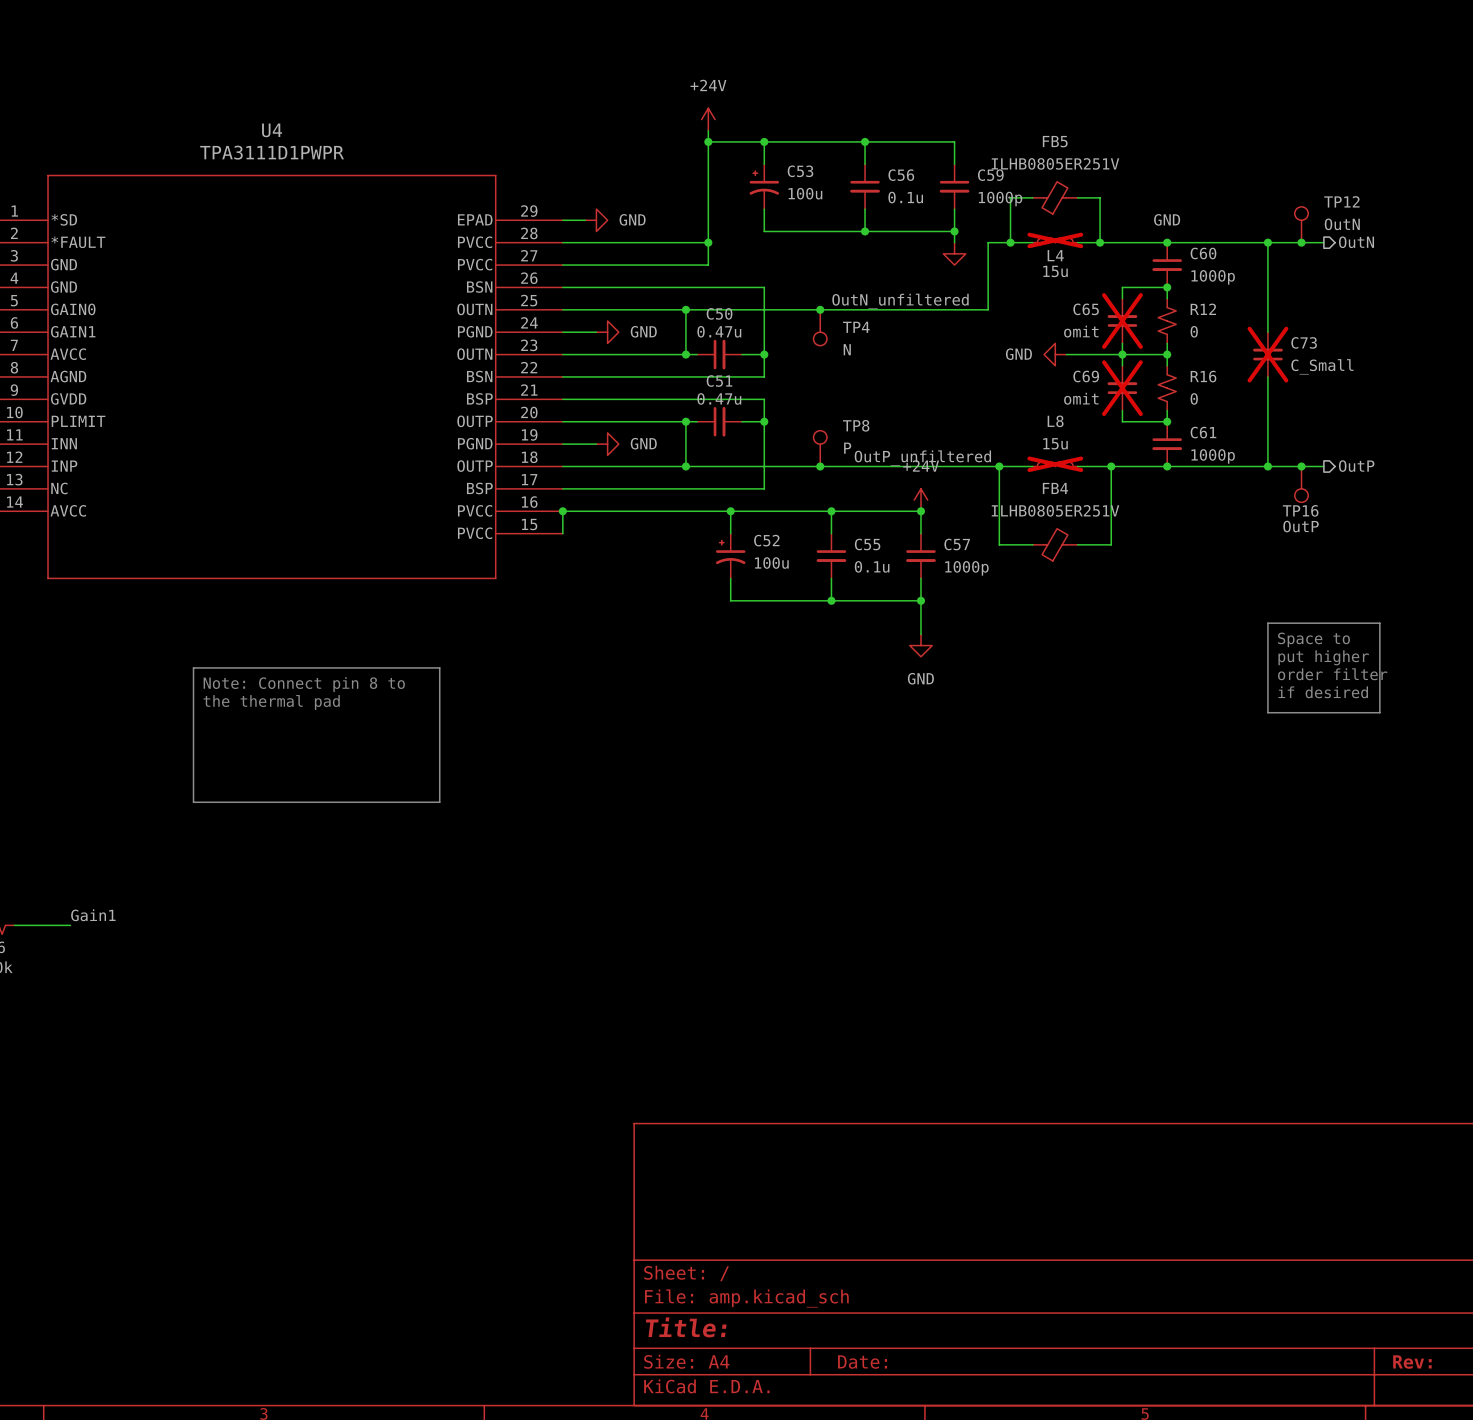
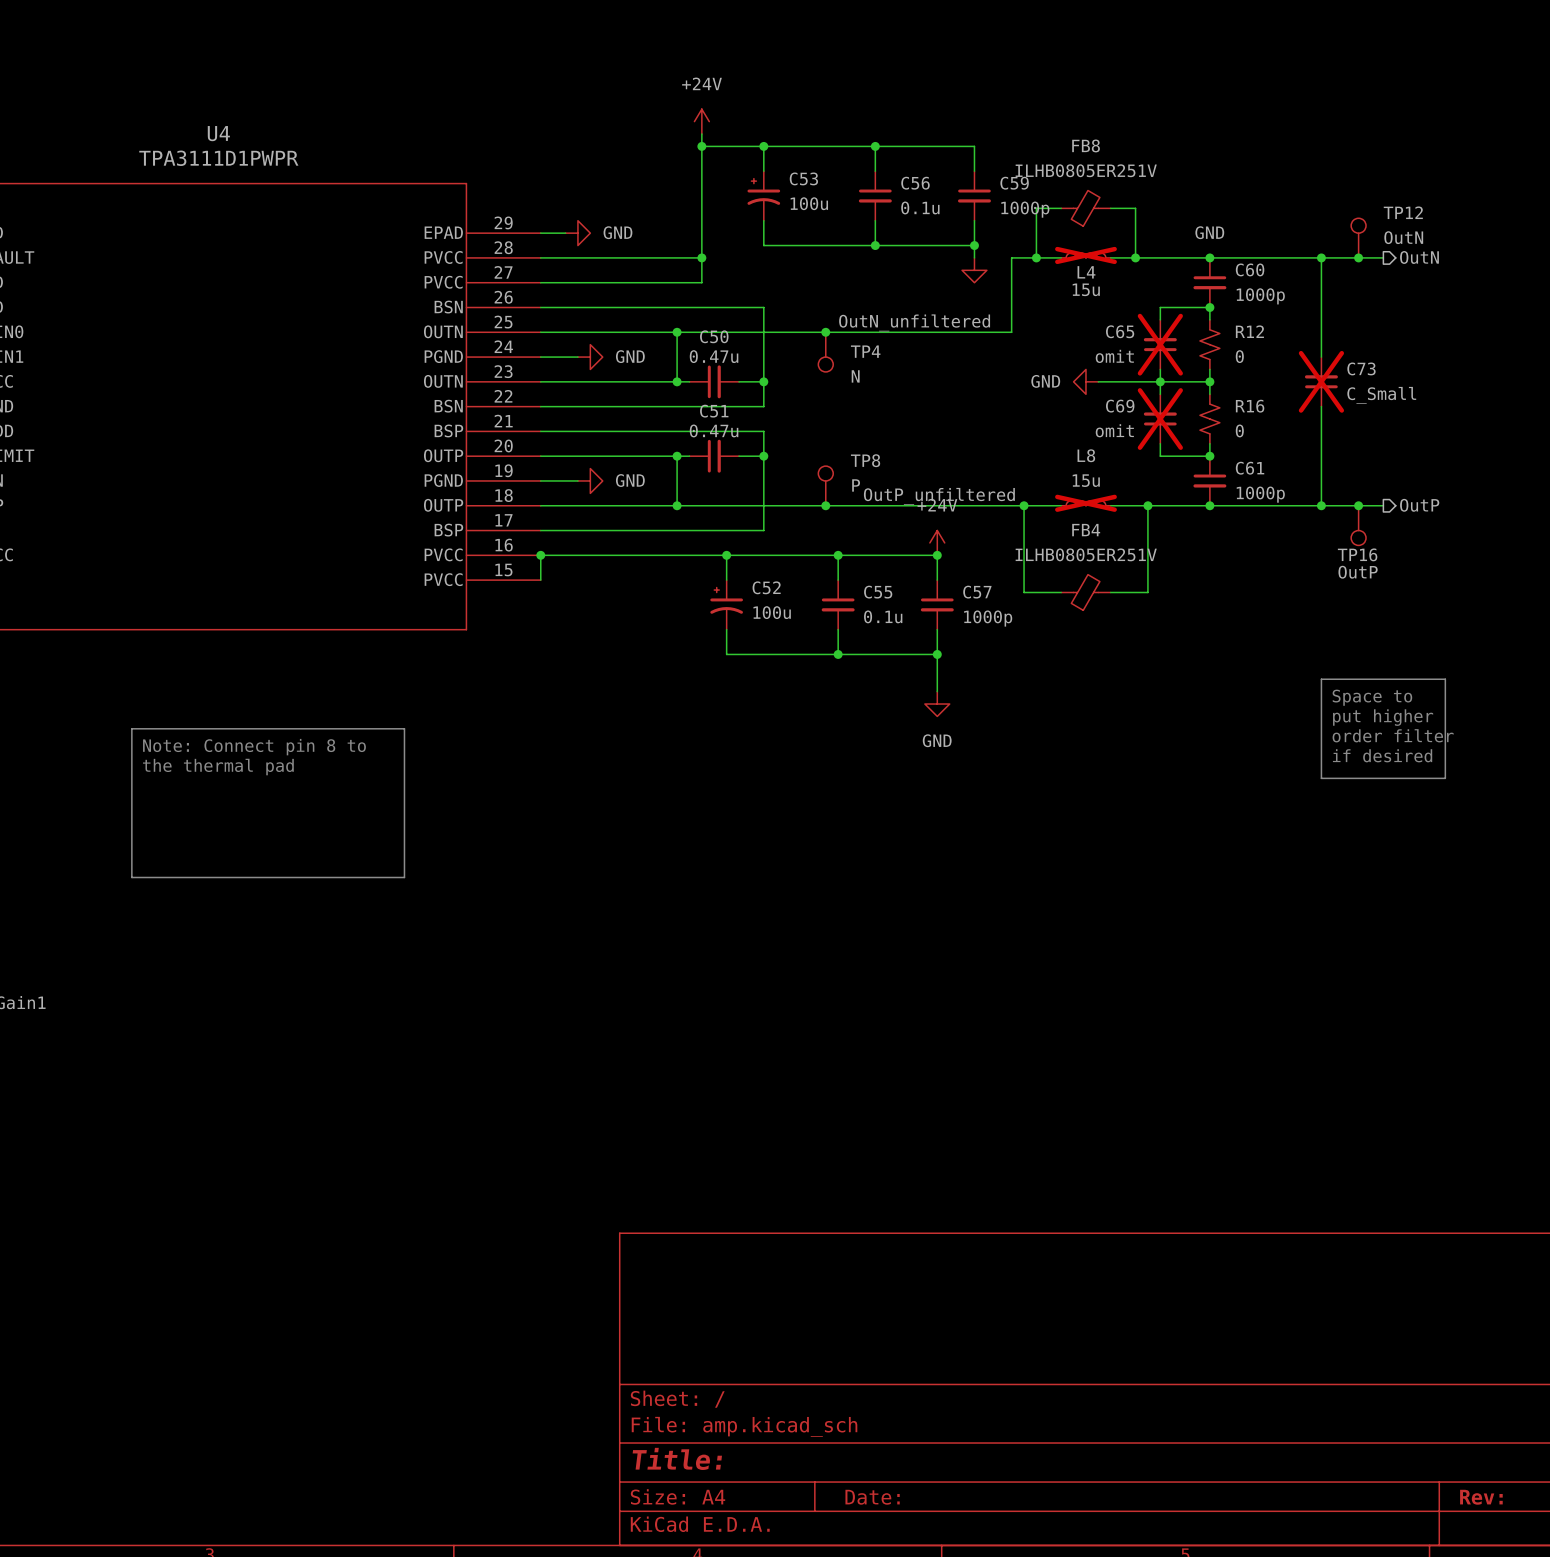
FB5 name: FB5 (1055, 141) -> FB8 (1086, 145)

